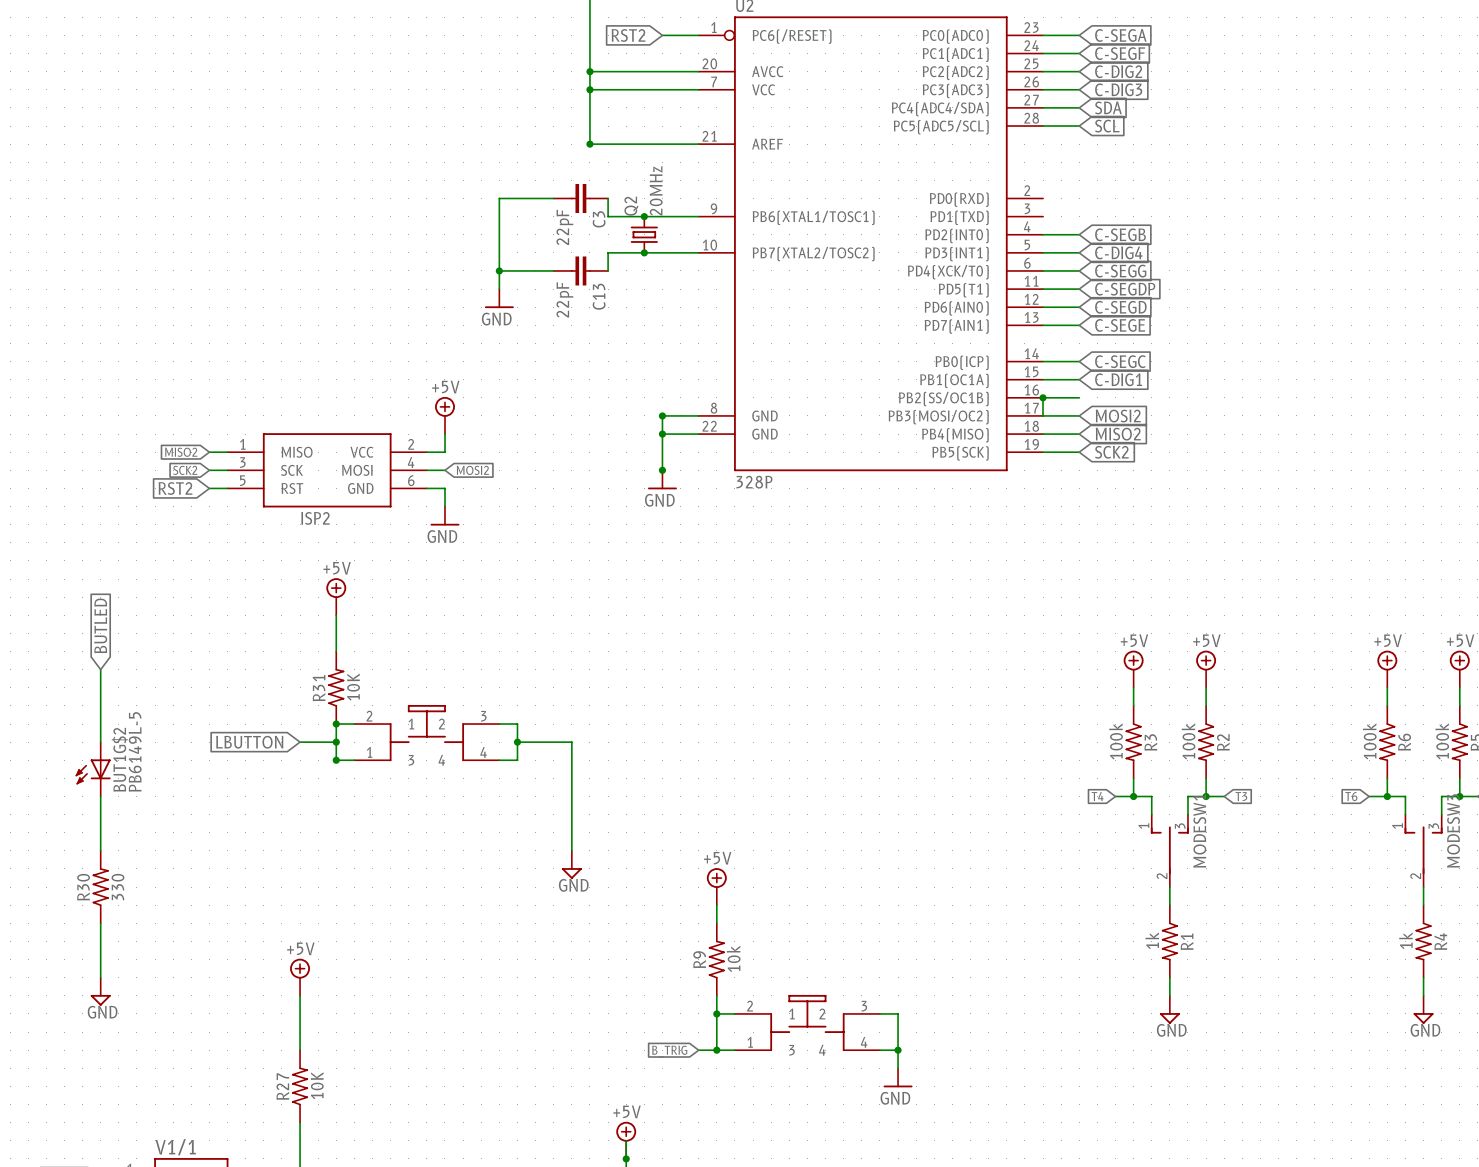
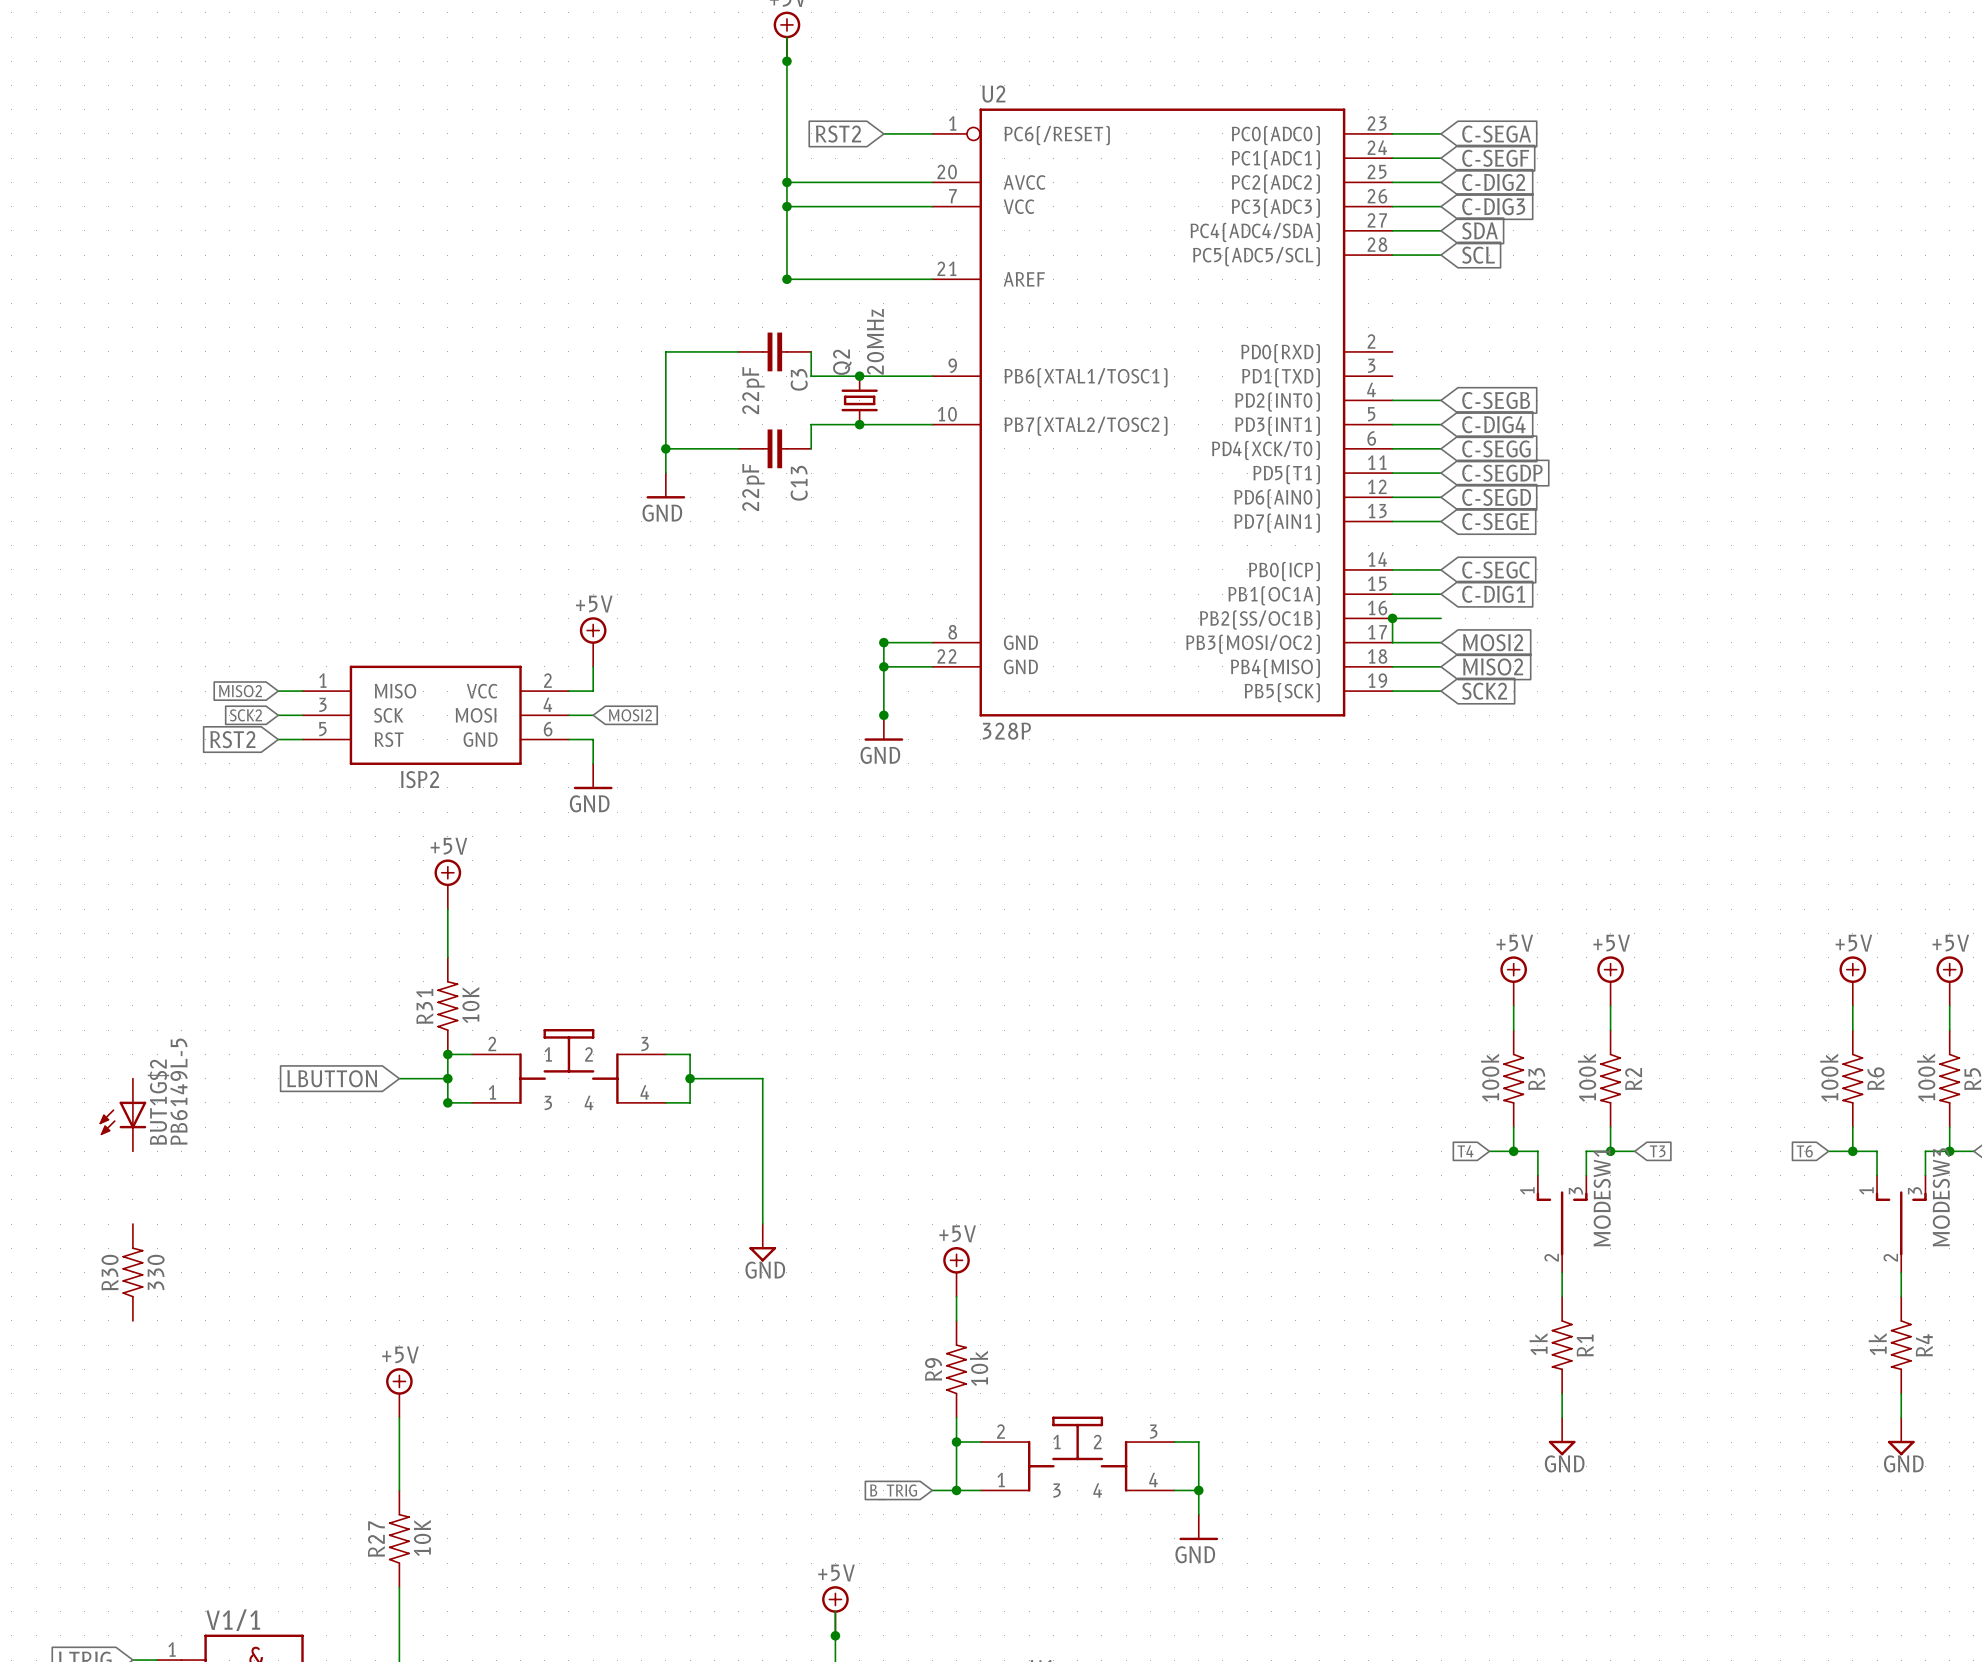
global label: BUTLED (100, 625) -> none
wire: (100, 669) (100, 742) -> none
wire: (100, 796) (100, 850) -> none
wire: (100, 923) (100, 977) -> none
power symbol: GND (100, 991) -> none

